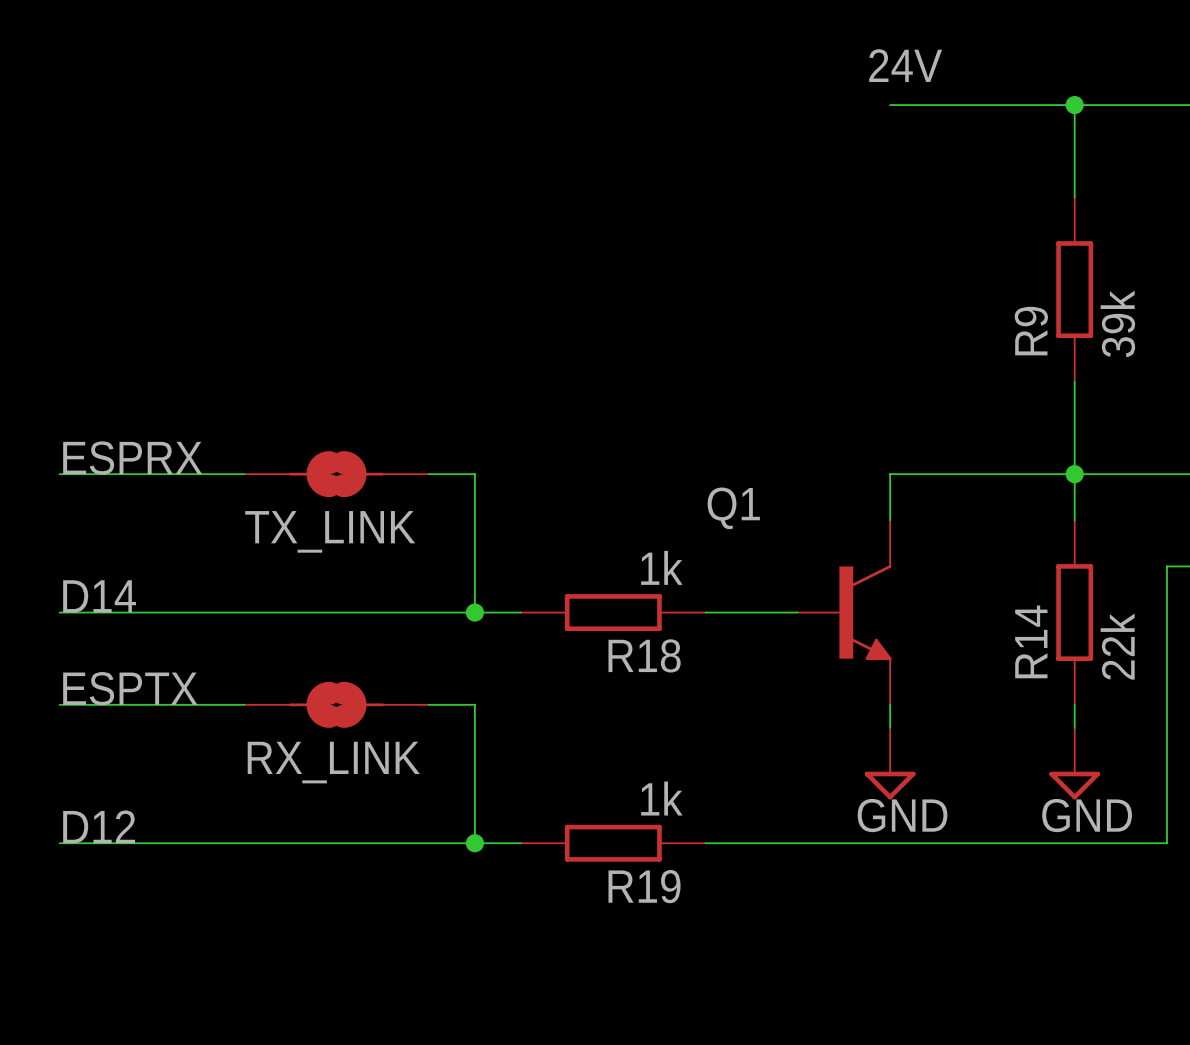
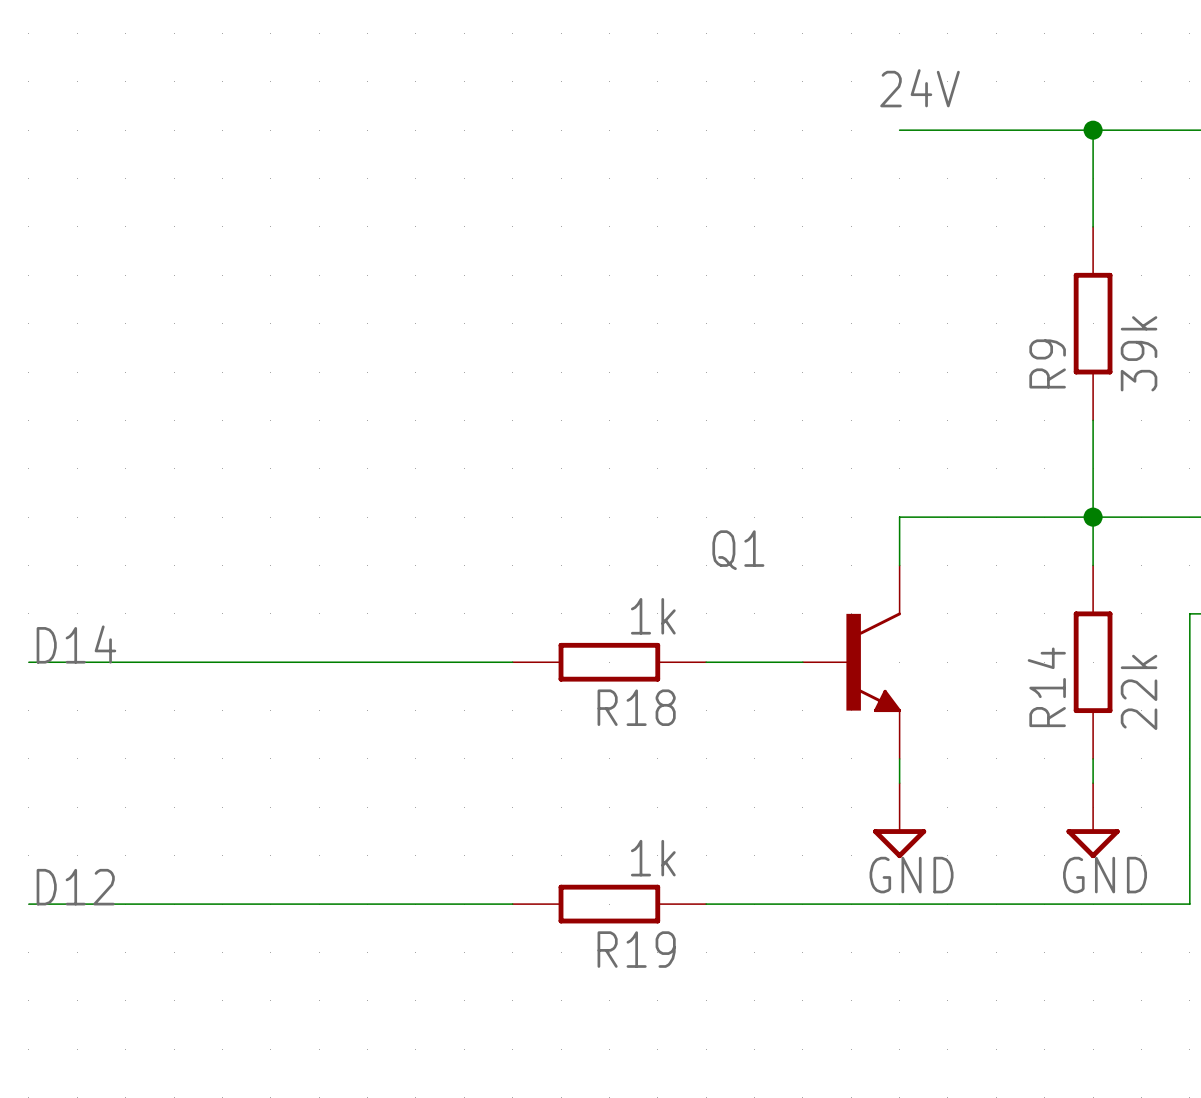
label: ESPRX (132, 457) -> none
wire: (59, 474) (244, 474) -> none
TX_LINK: (336, 474) -> none
wire: (428, 474) (474, 474) (474, 612) -> none
junction: (474, 612) -> none
label: ESPTX (130, 688) -> none
wire: (59, 704) (244, 704) -> none
RX_LINK: (336, 704) -> none
wire: (428, 704) (474, 704) (474, 843) -> none
junction: (474, 843) -> none

